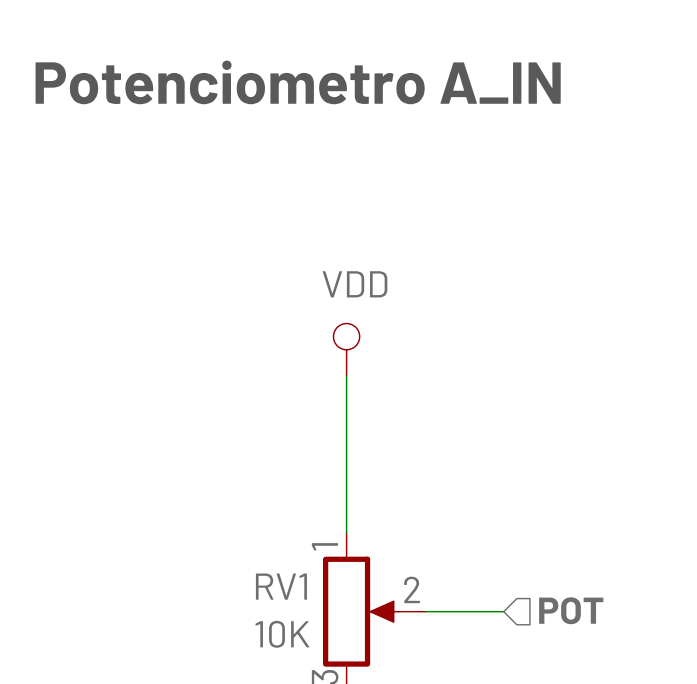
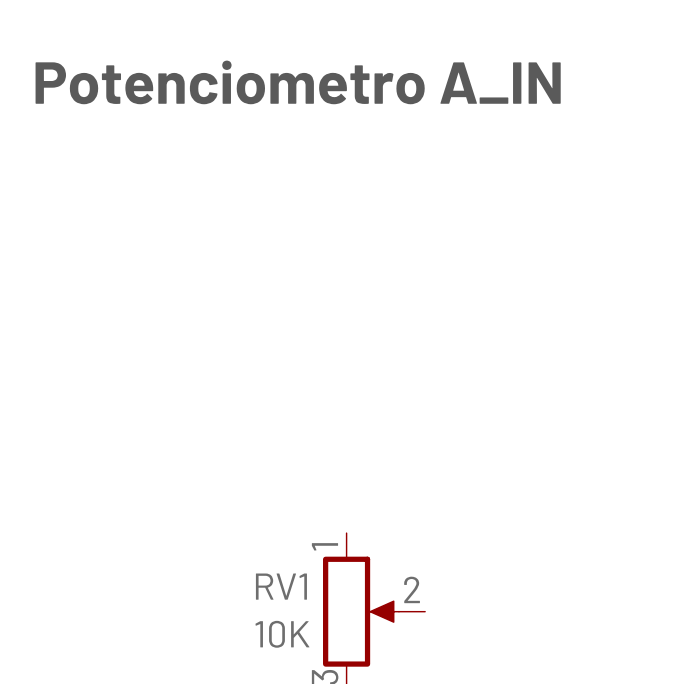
power symbol: VDD (346, 349) -> none
wire: (346, 375) (346, 533) -> none
hierarchical label: POT (571, 610) -> none
wire: (425, 611) (503, 611) -> none

